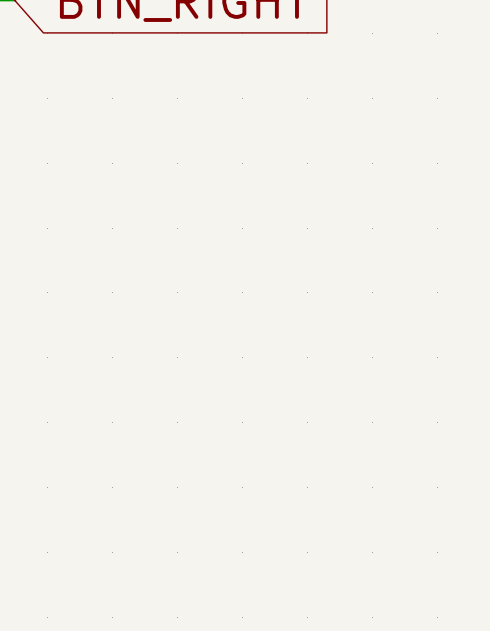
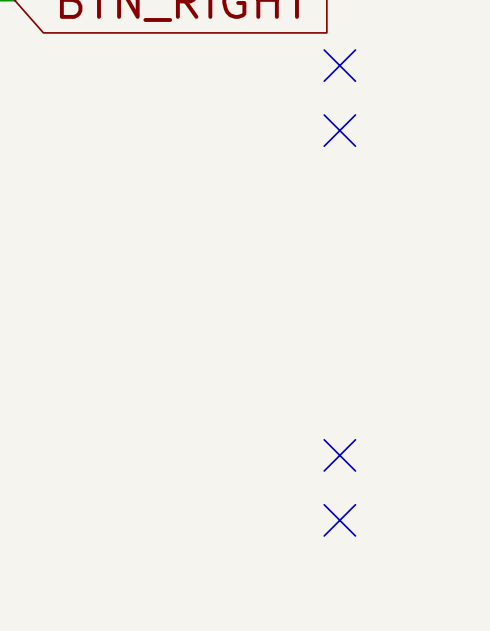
no-connect mark: none -> (339, 65)
no-connect mark: none -> (339, 130)
no-connect mark: none -> (339, 455)
no-connect mark: none -> (339, 520)

